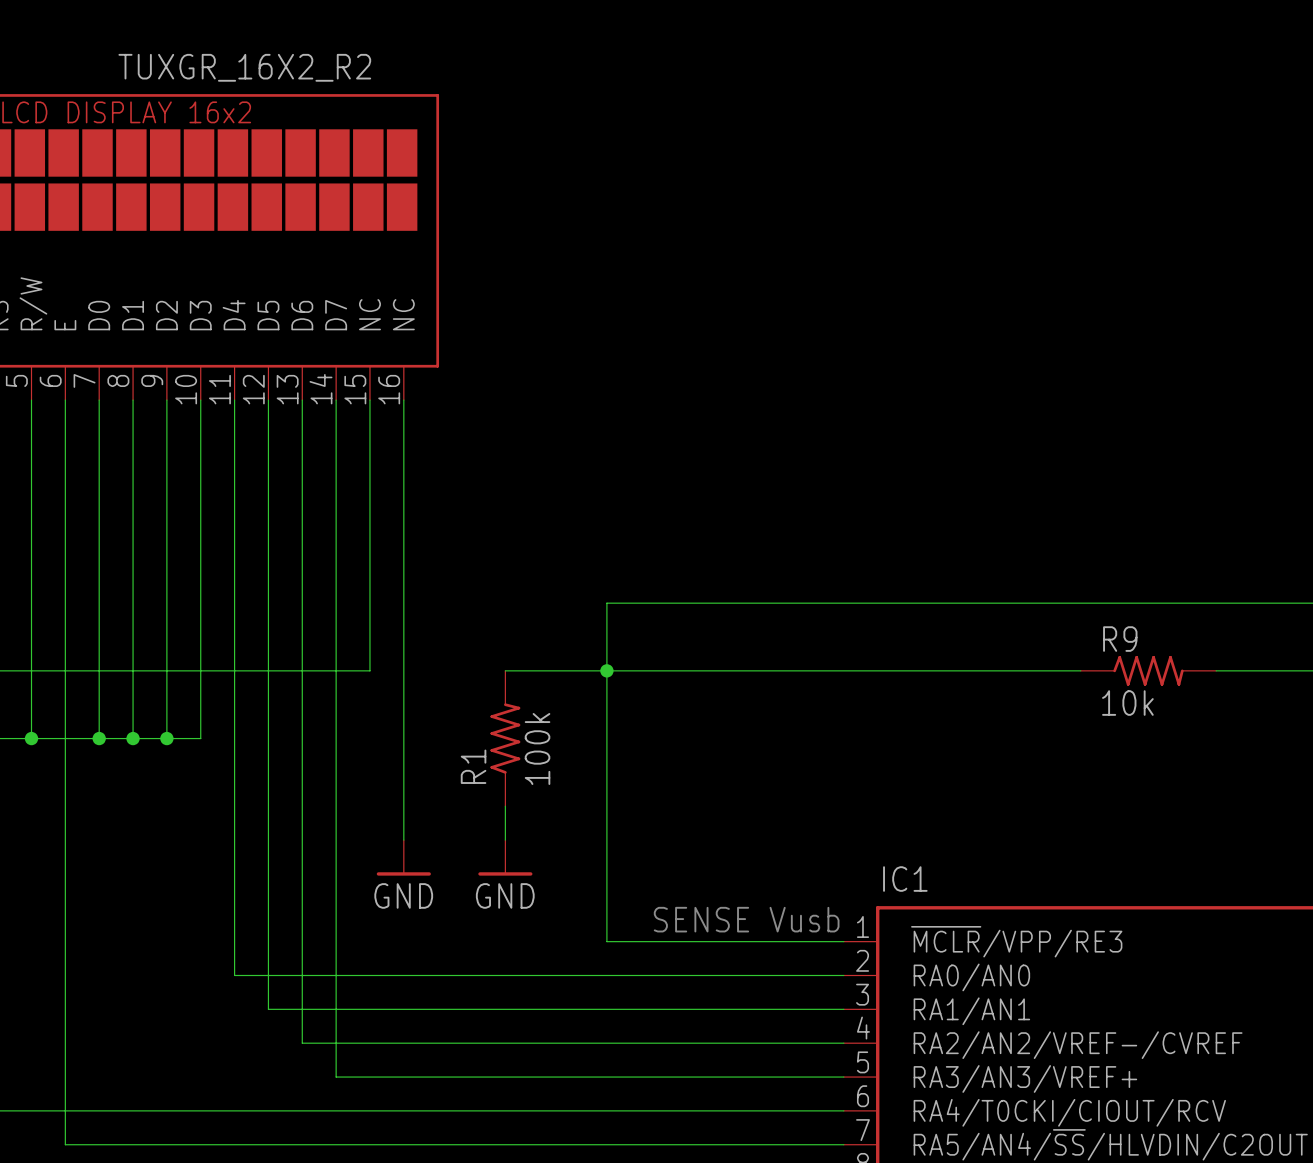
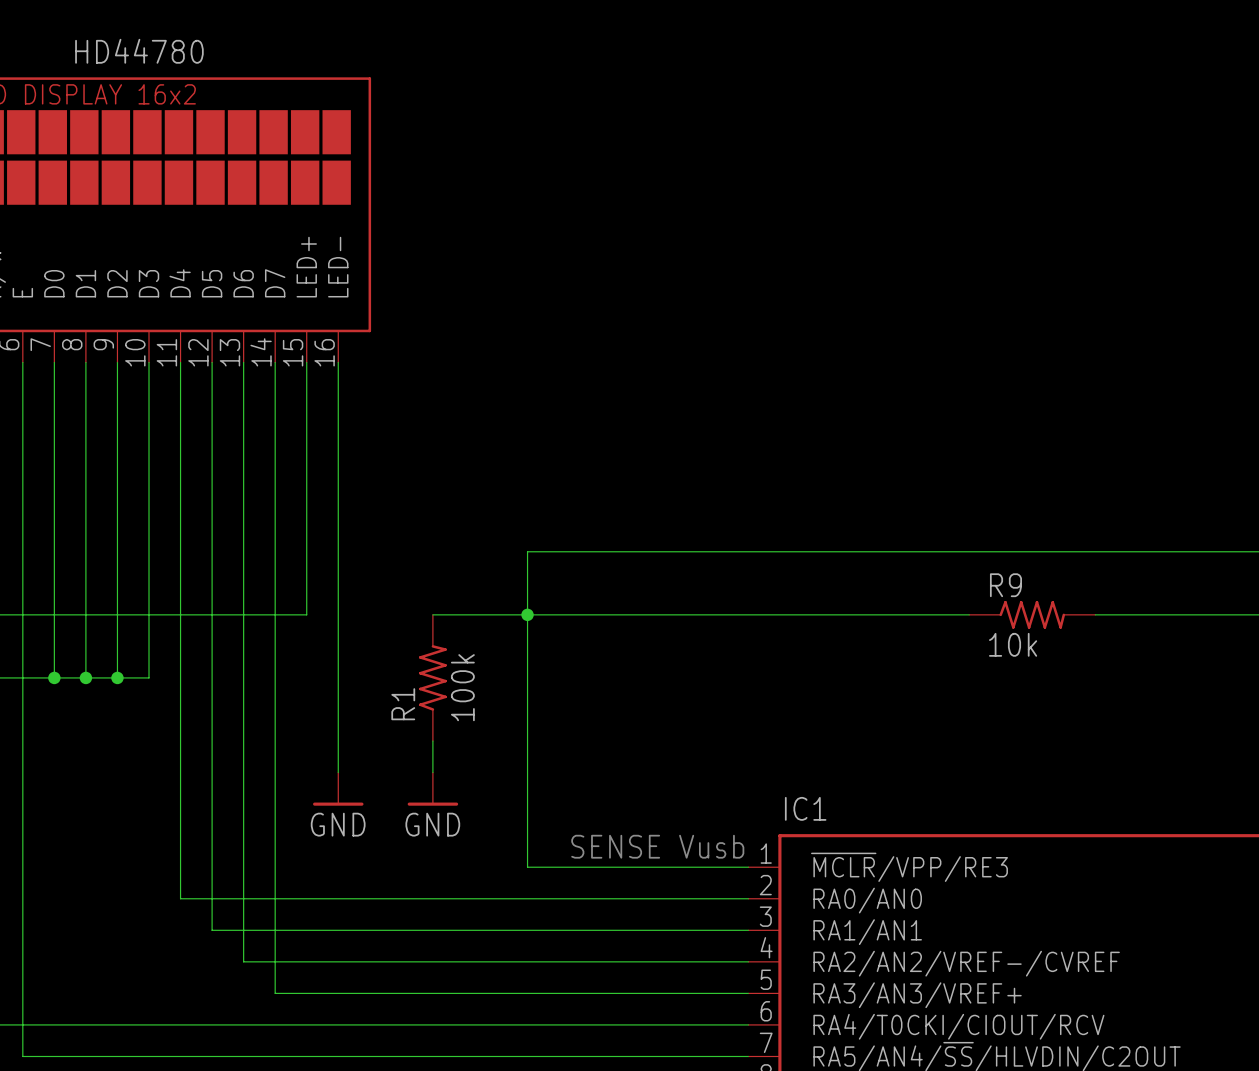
part value: TUXGR_16X2_R2 (244, 67) -> HD44780 (139, 51)
part pin name: NC (369, 314) -> LED+ (306, 267)
part pin name: NC (403, 314) -> LED- (338, 267)

